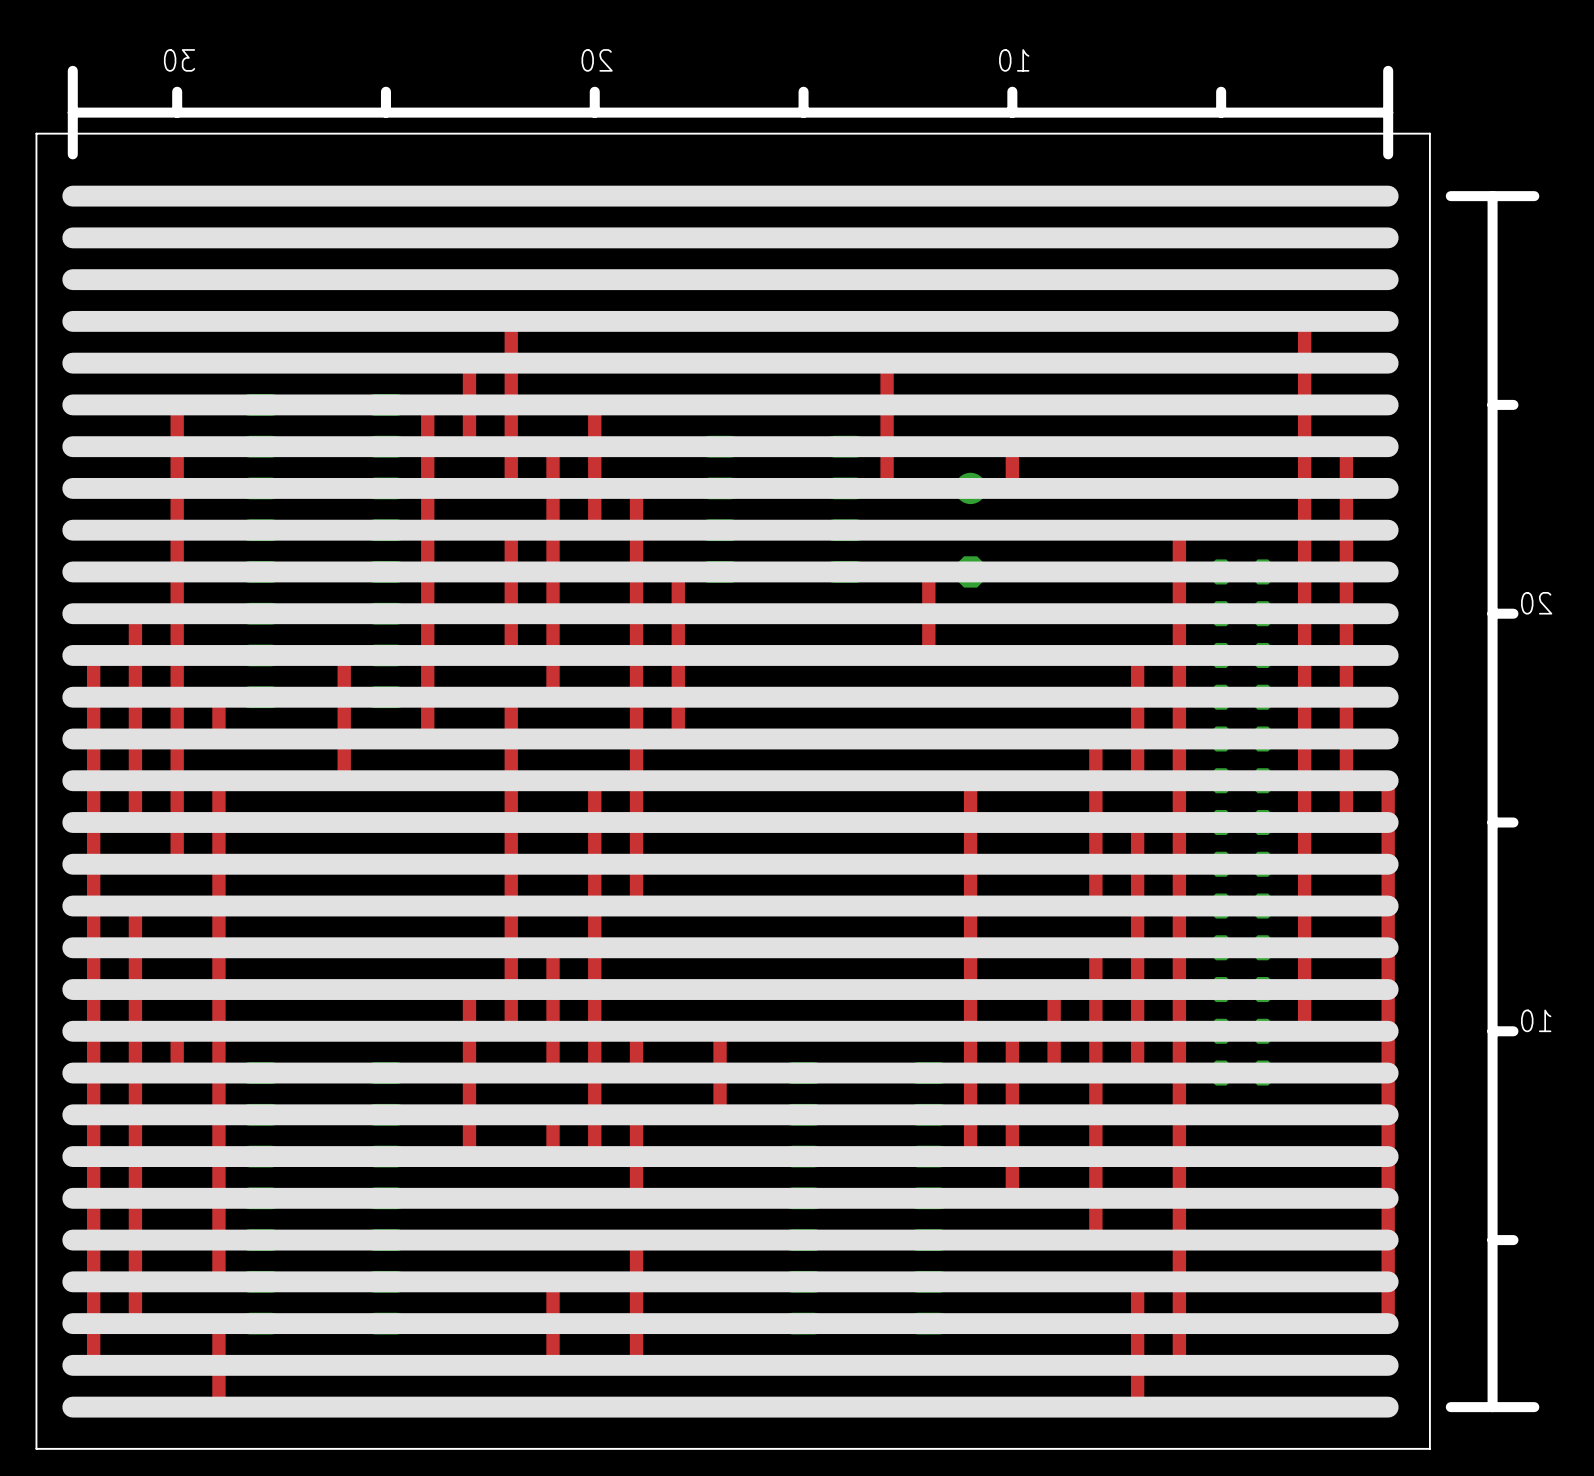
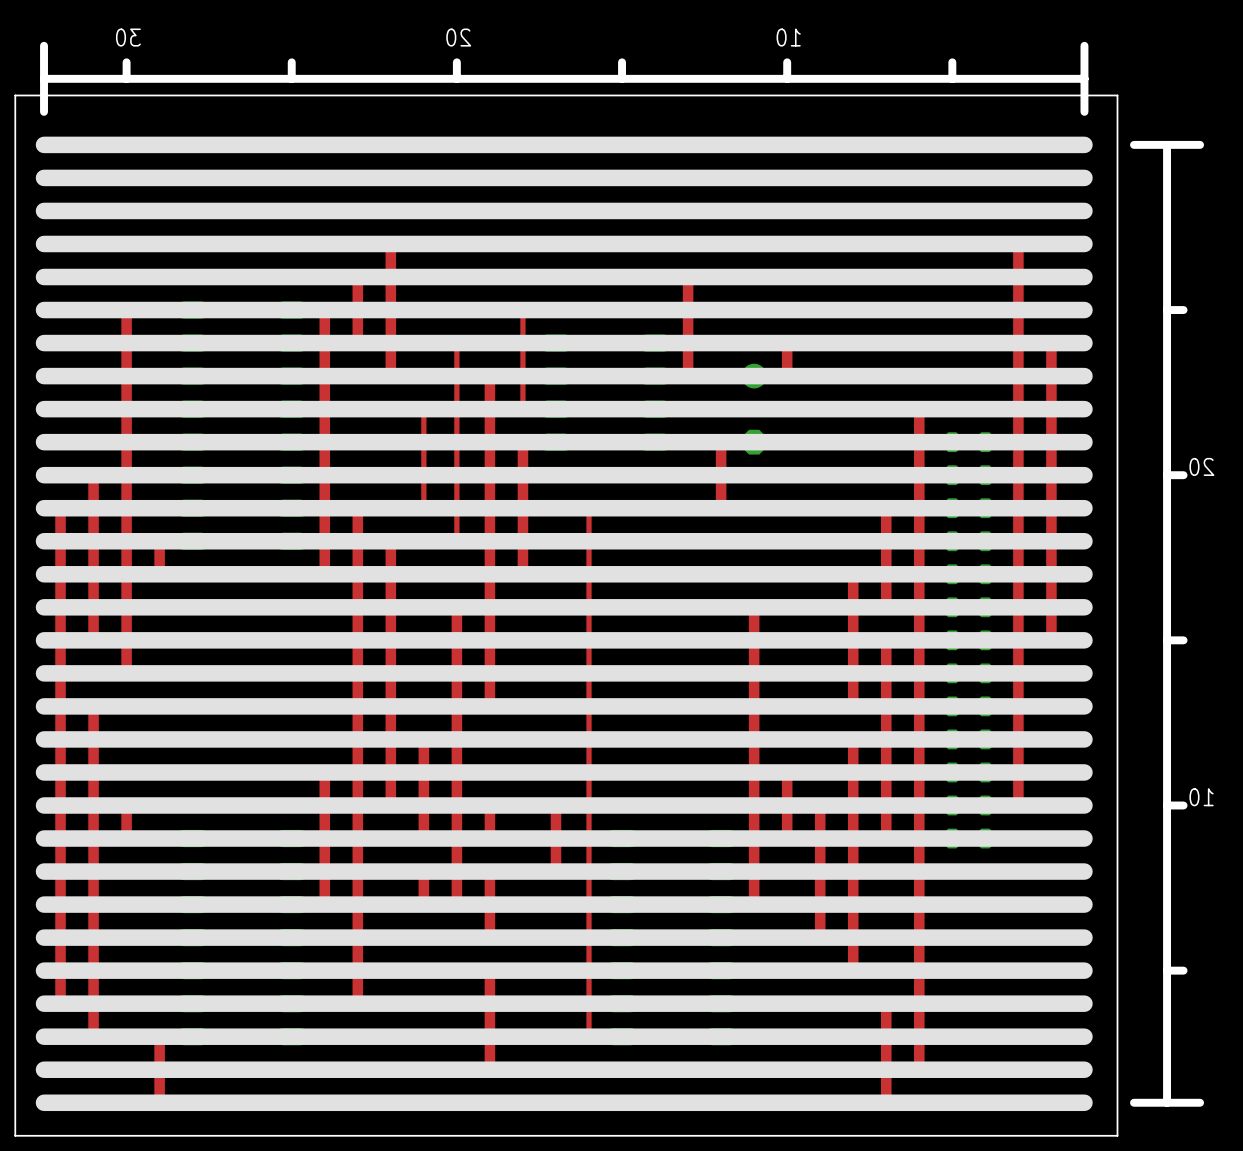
top track: (594, 404) (594, 446) -> none
top track: (553, 446) (553, 530) -> none
top track width: thick (594, 446) (594, 530) -> thin (456, 343) (456, 409)
top track: (511, 530) (511, 655) -> (522, 310) (522, 409)
top track width: thick (553, 530) (553, 655) -> thin (423, 409) (423, 508)
top track: none -> (456, 409) (456, 541)
top track: (344, 655) (344, 780) -> none
top track: none -> (357, 508) (357, 772)
top track: (553, 655) (553, 697) -> none
top track: none -> (589, 508) (589, 1036)
top track: (218, 780) (218, 1281) -> none
top track: (1388, 780) (1388, 1323) -> none
top track: none -> (324, 772) (324, 904)
top track: (1054, 989) (1054, 1031) -> (787, 772) (787, 805)
top track: (1012, 1073) (1012, 1198) -> (820, 838) (820, 937)
top track: none -> (357, 904) (357, 1003)
top track: (93, 1281) (93, 1365) -> none
top track: (553, 1281) (553, 1365) -> none

